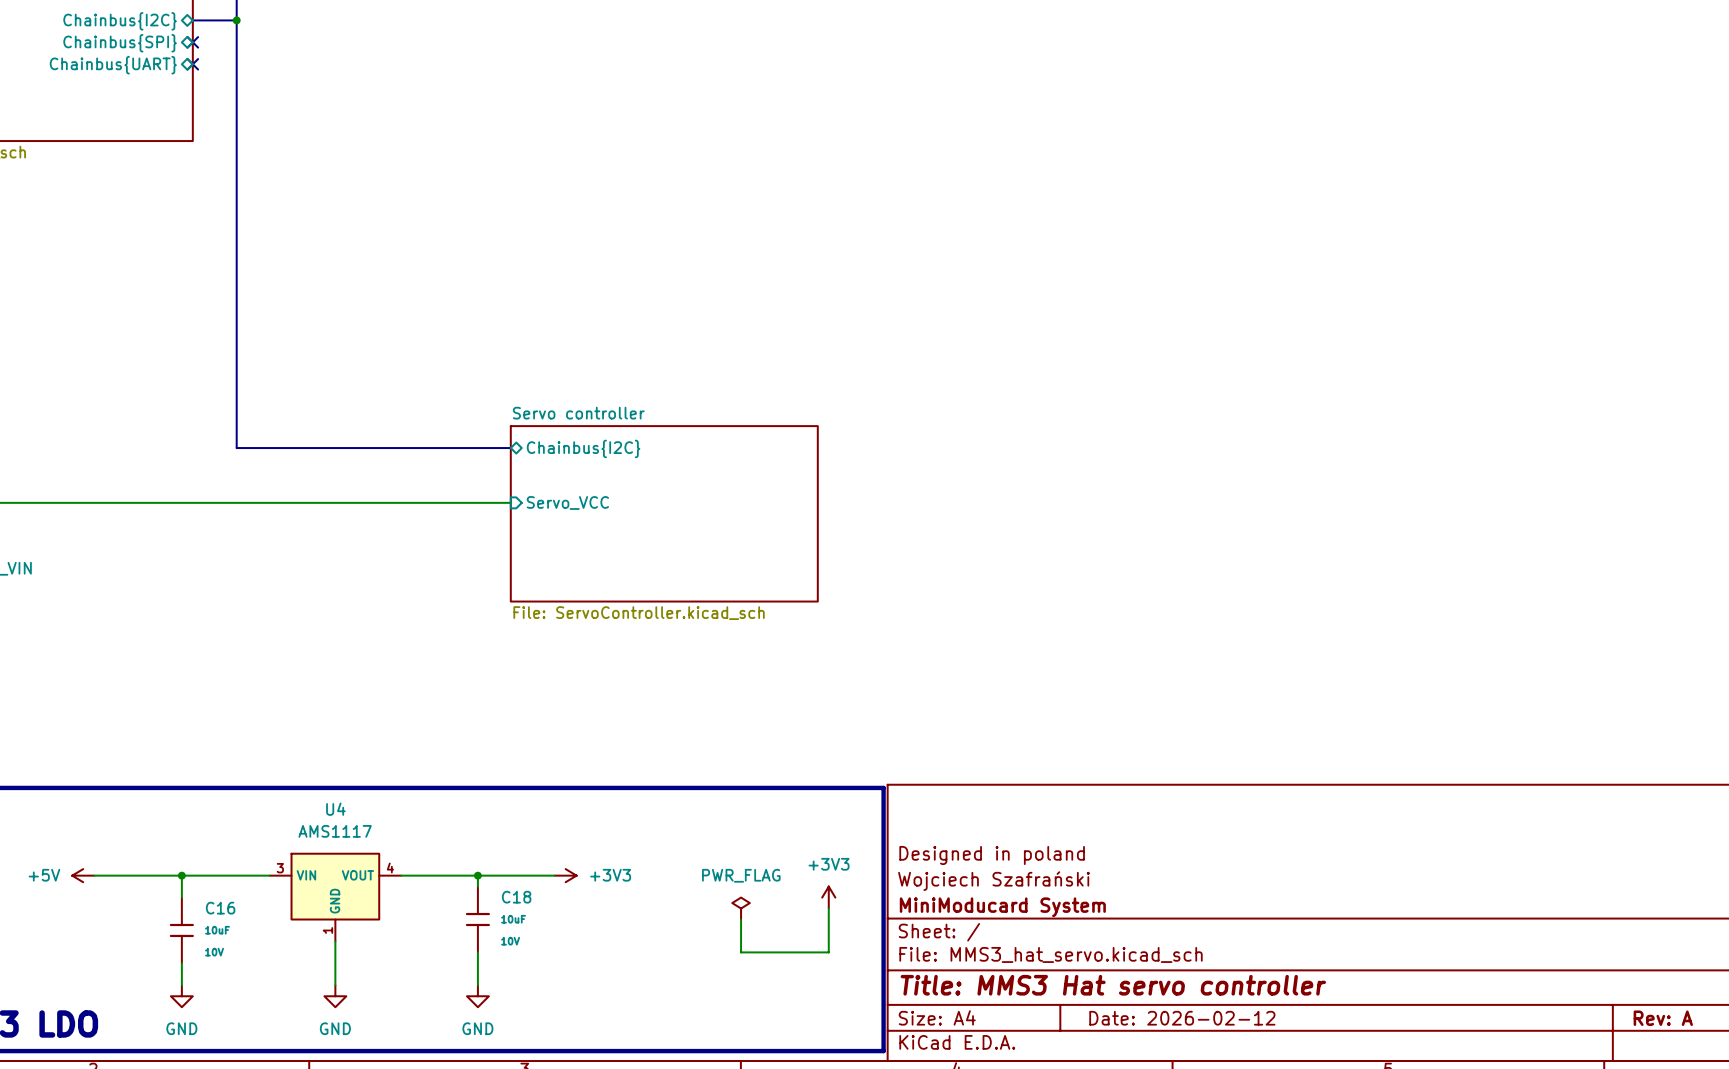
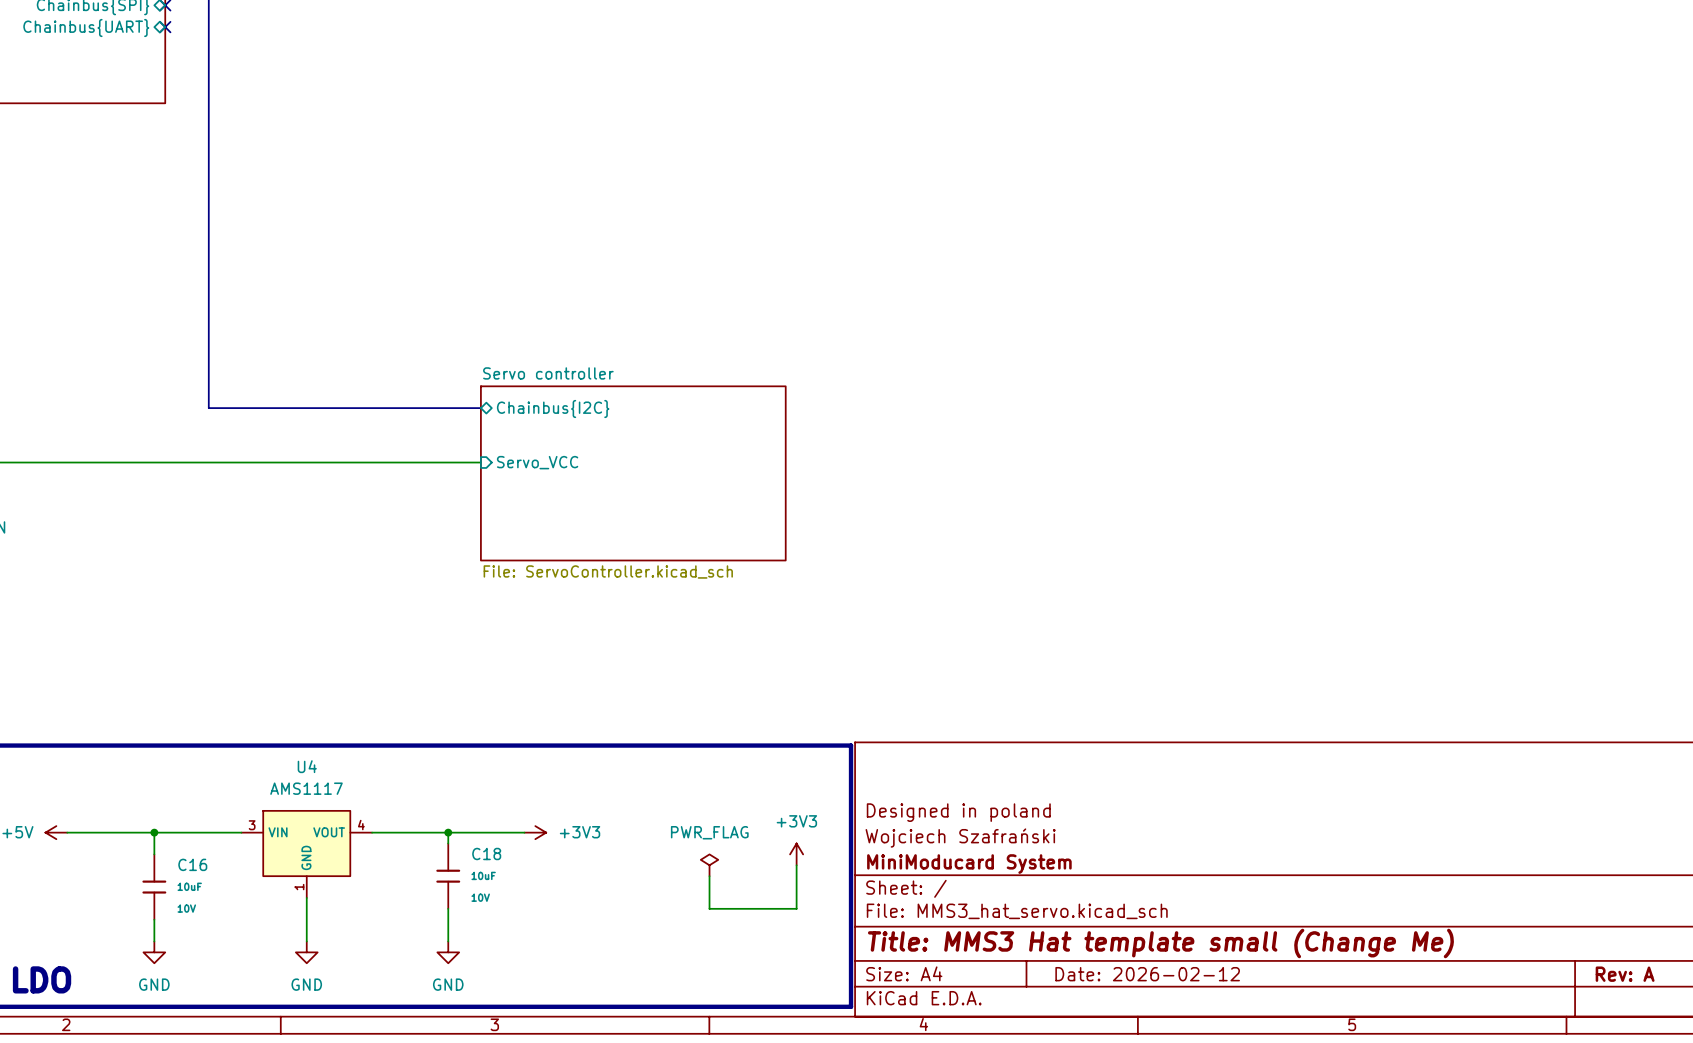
title block: Title: MMS3 Hat servo controller (1113, 985) -> Title: MMS3 Hat template small (Change Me) (1160, 943)

